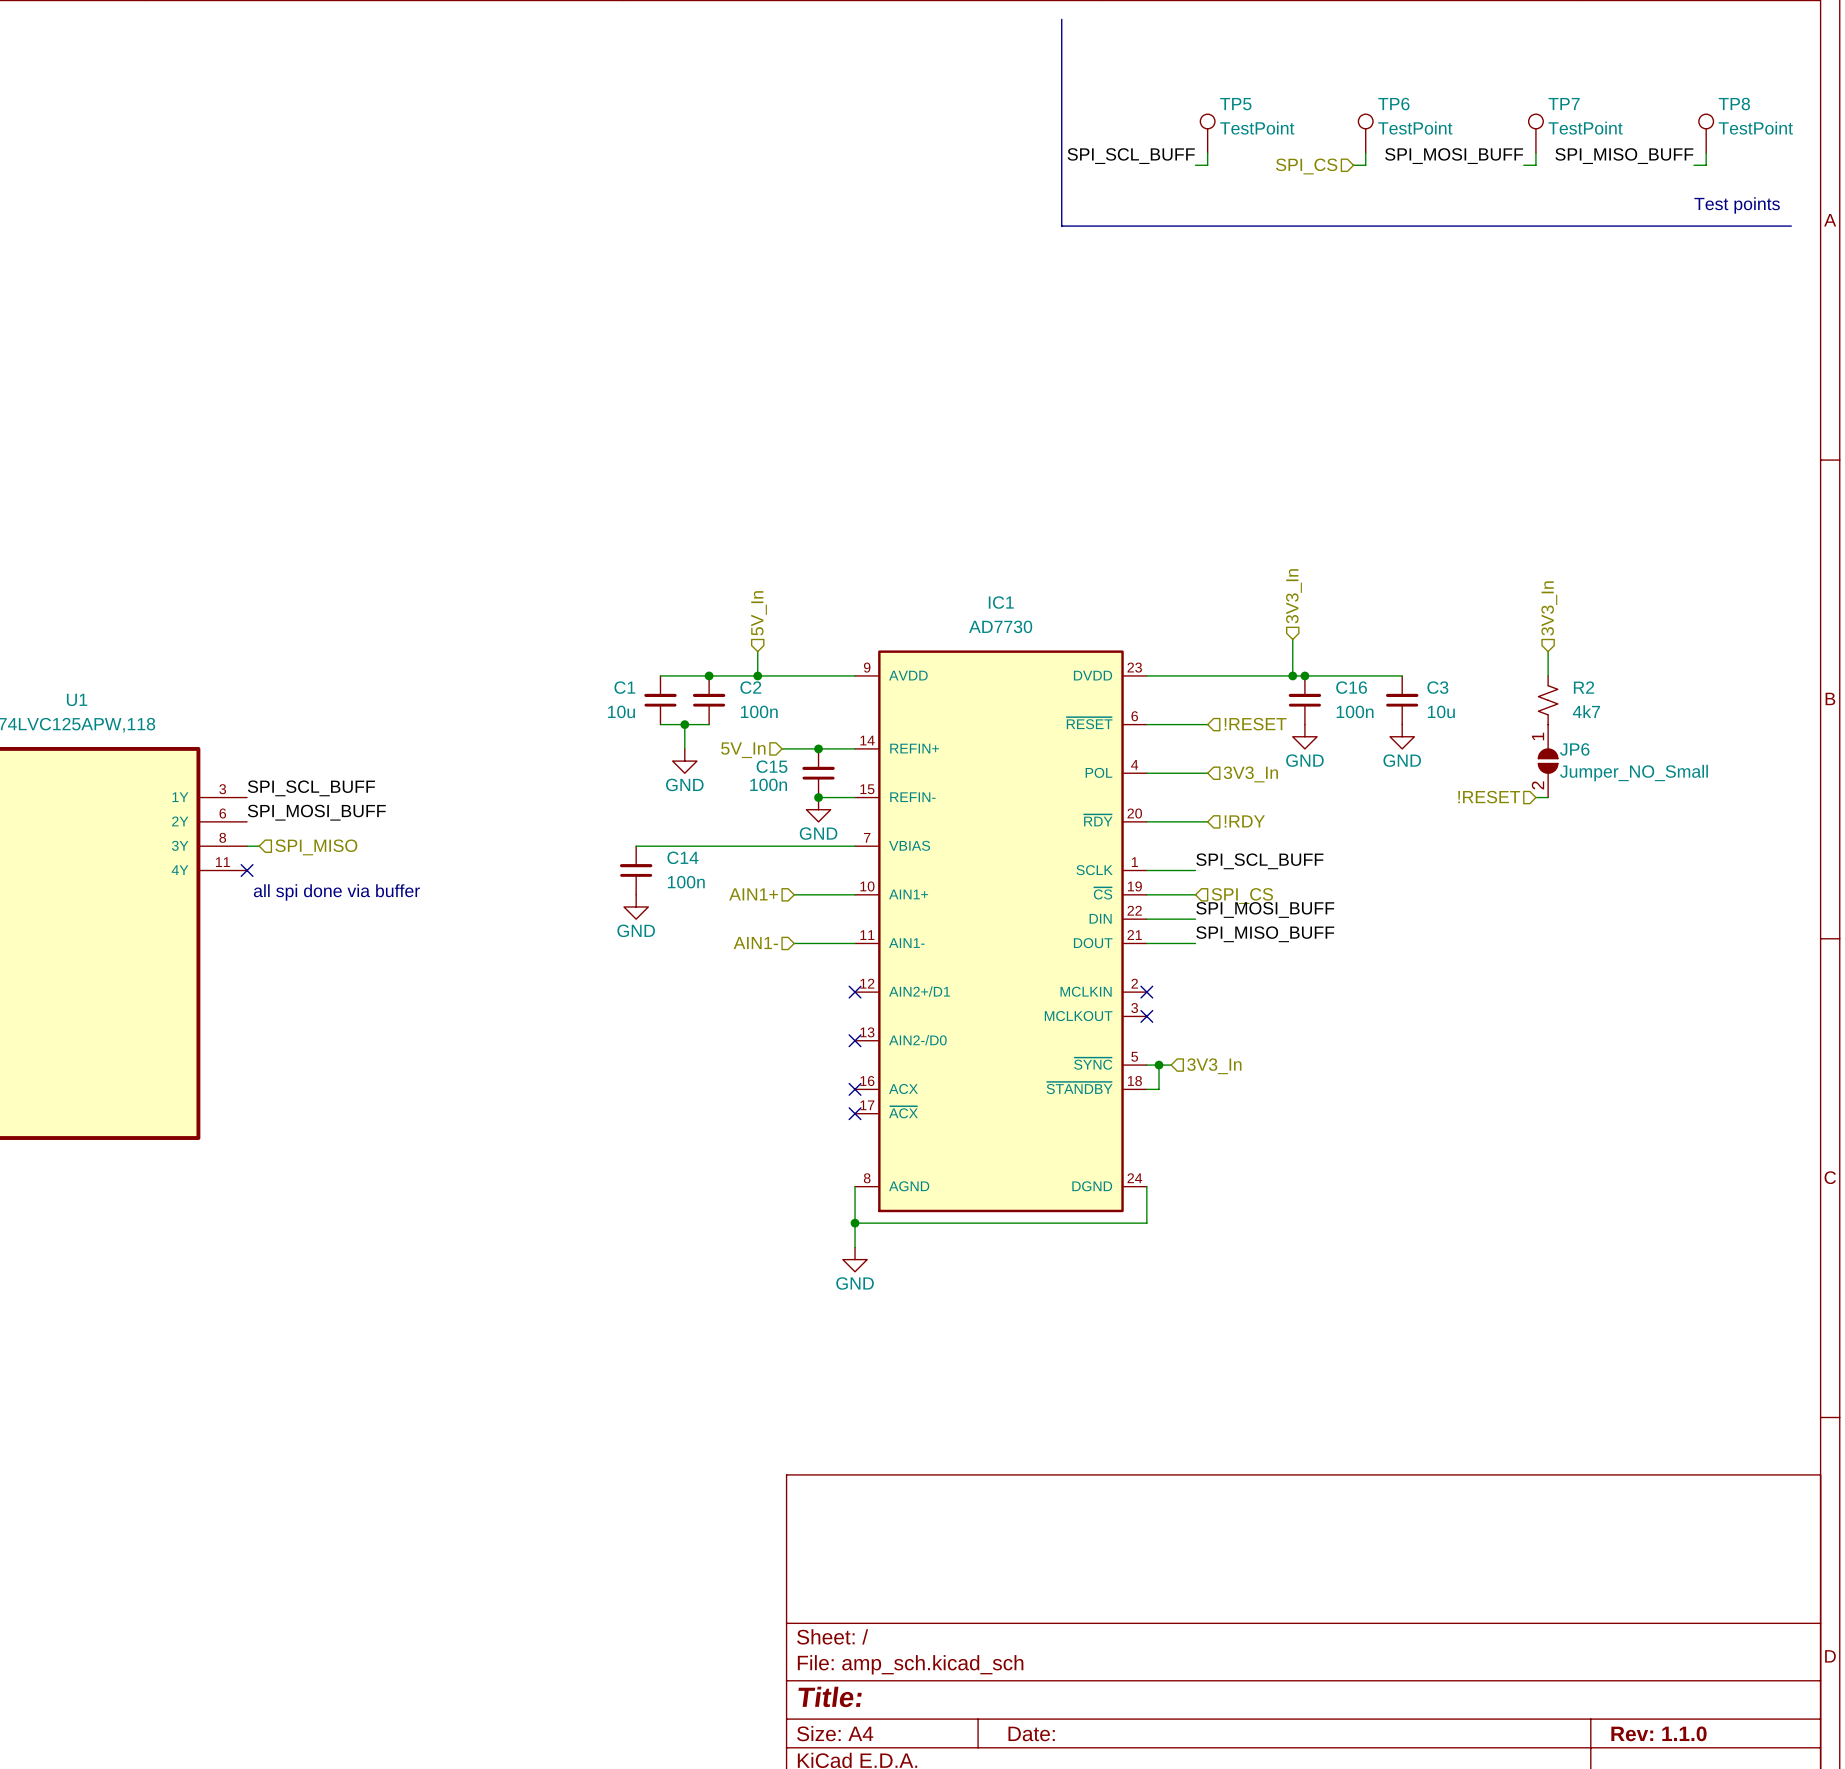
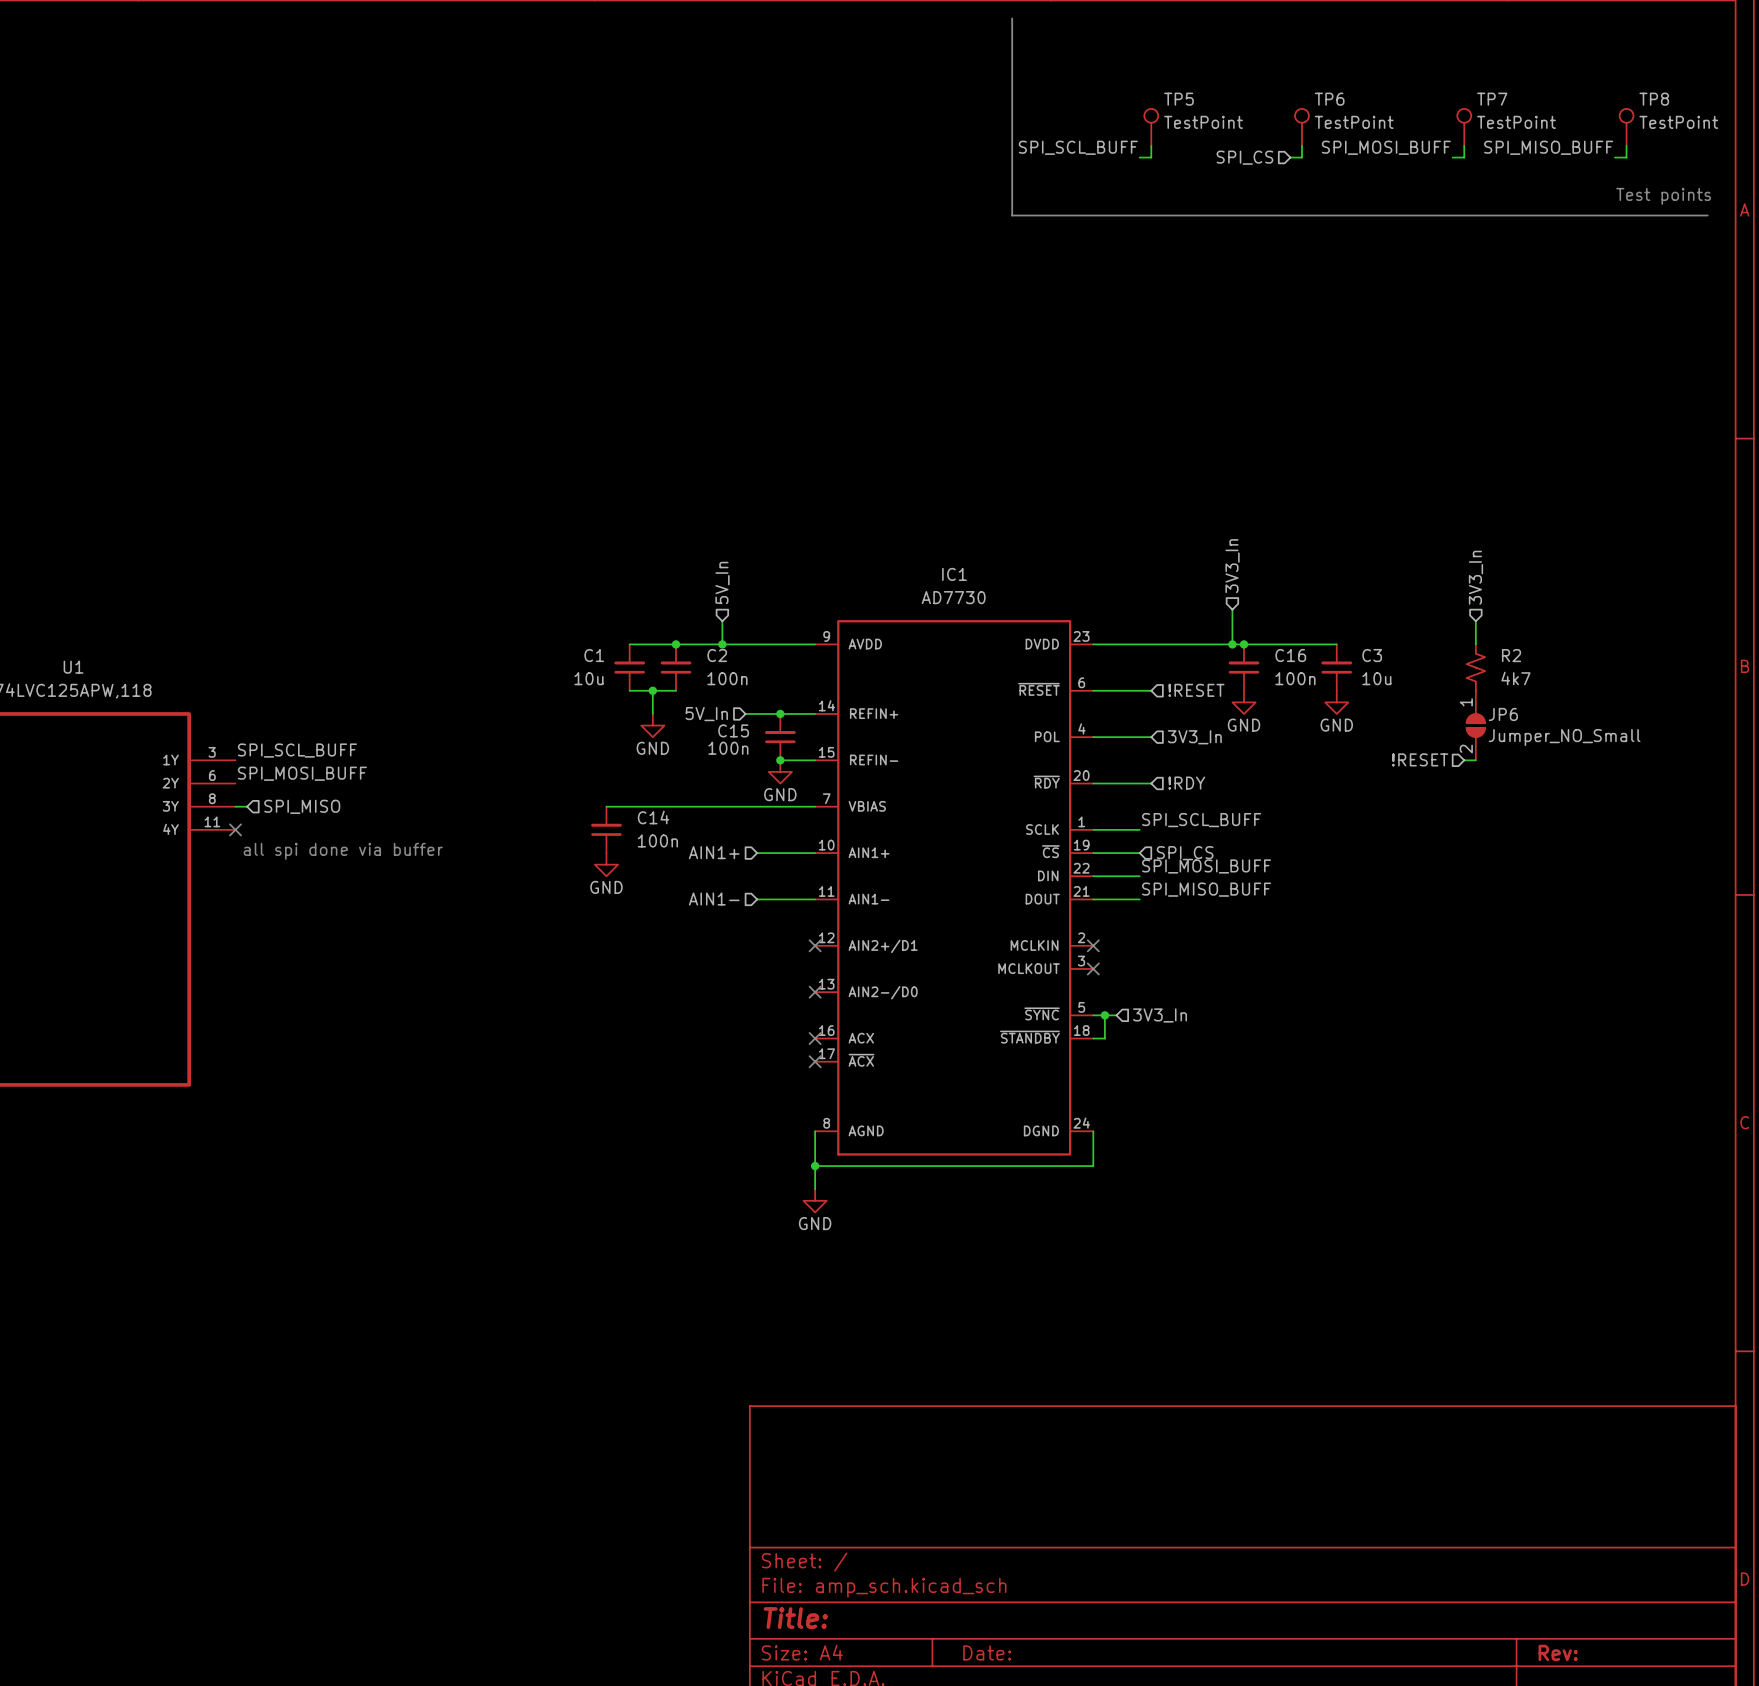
title block: Rev: 1.1.0 (1658, 1733) -> Rev: (1558, 1652)

